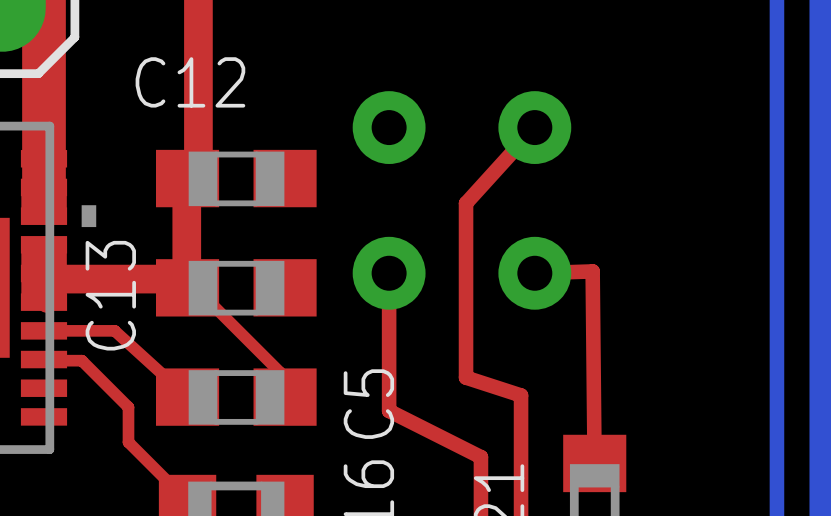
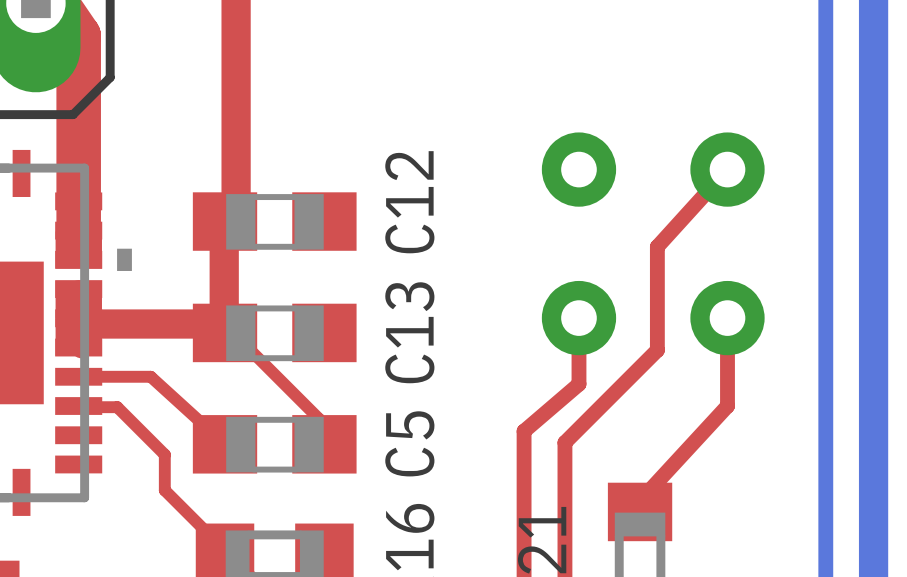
C12 name rotation: 0° (190, 82) -> 90° counterclockwise (409, 202)
C12 name position: C12 (190, 82) -> C12 (409, 202)
top track: (534, 127) (466, 203) (466, 377) (521, 395) -> (727, 169) (657, 246) (657, 350) (564, 442)
part position: (461, 200) -> (653, 243)
top track: (389, 273) (389, 410) (480, 457) -> none
top track: (534, 273) (592, 271) (594, 463) -> (578, 318) (578, 384) (524, 431) (524, 505)
top track: none -> (727, 318) (727, 406) (639, 501) (640, 511)
C13 name position: C13 (110, 295) -> C13 (409, 332)

